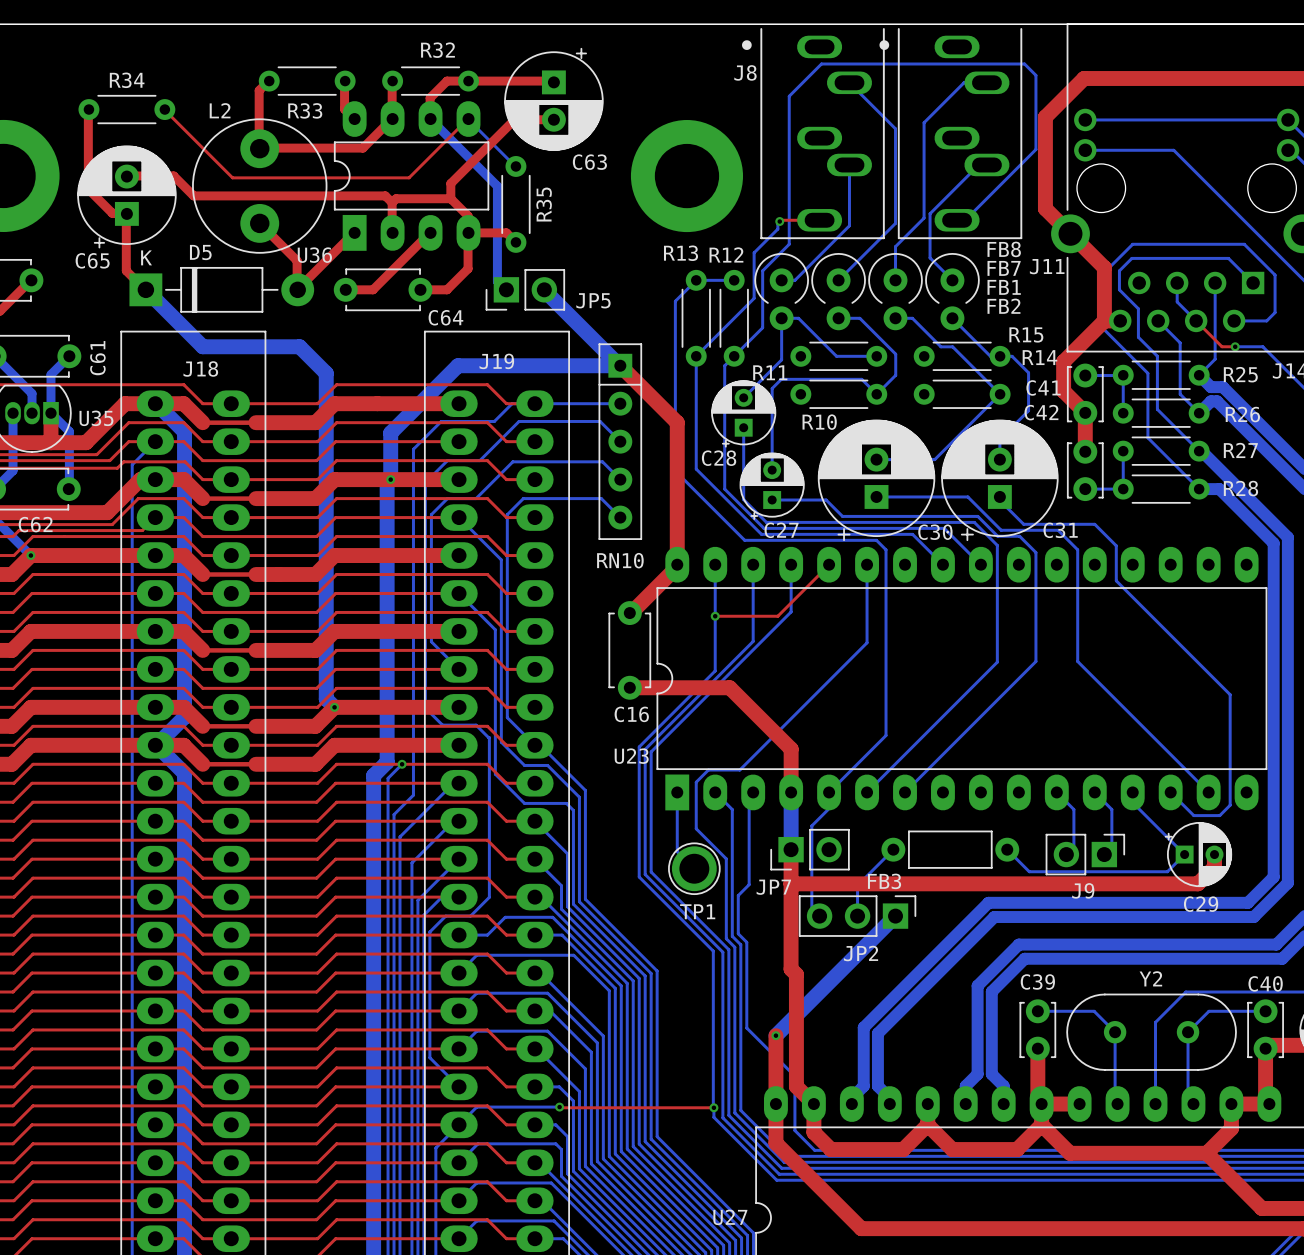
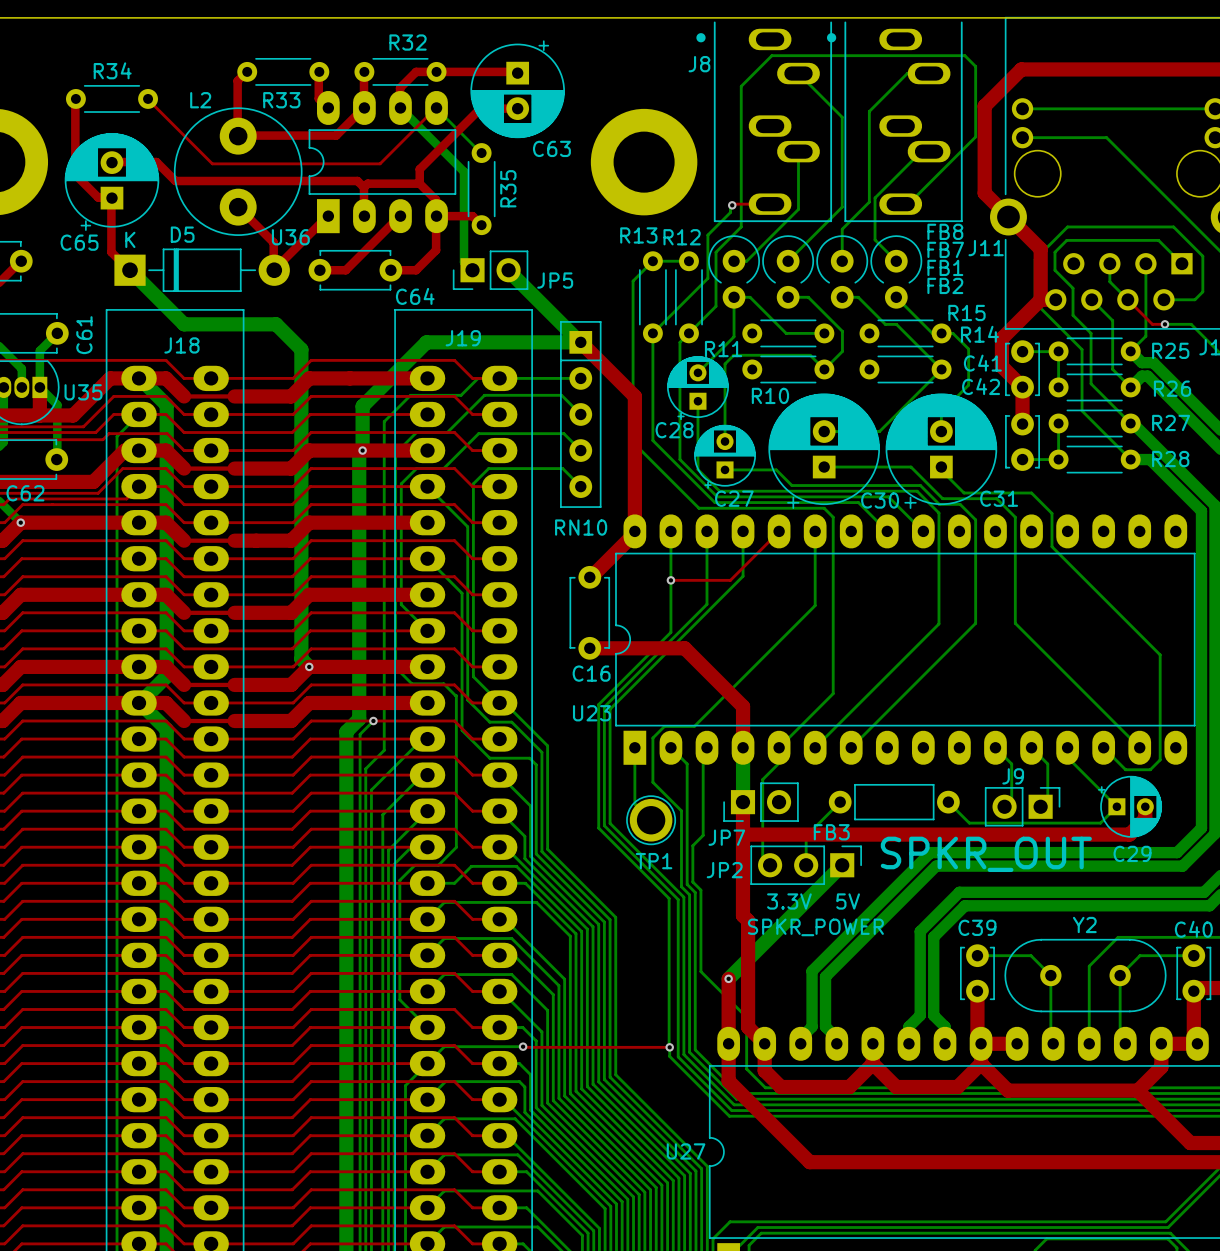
J9 name position: J9 (1083, 890) -> J9 (1013, 776)
text: none -> SPKR_OUT (986, 854)
JP2 name position: JP2 (861, 953) -> JP2 (724, 870)
text: none -> 3.3V (789, 901)
text: none -> 5V (848, 901)
text: none -> SPKR_POWER (815, 927)

